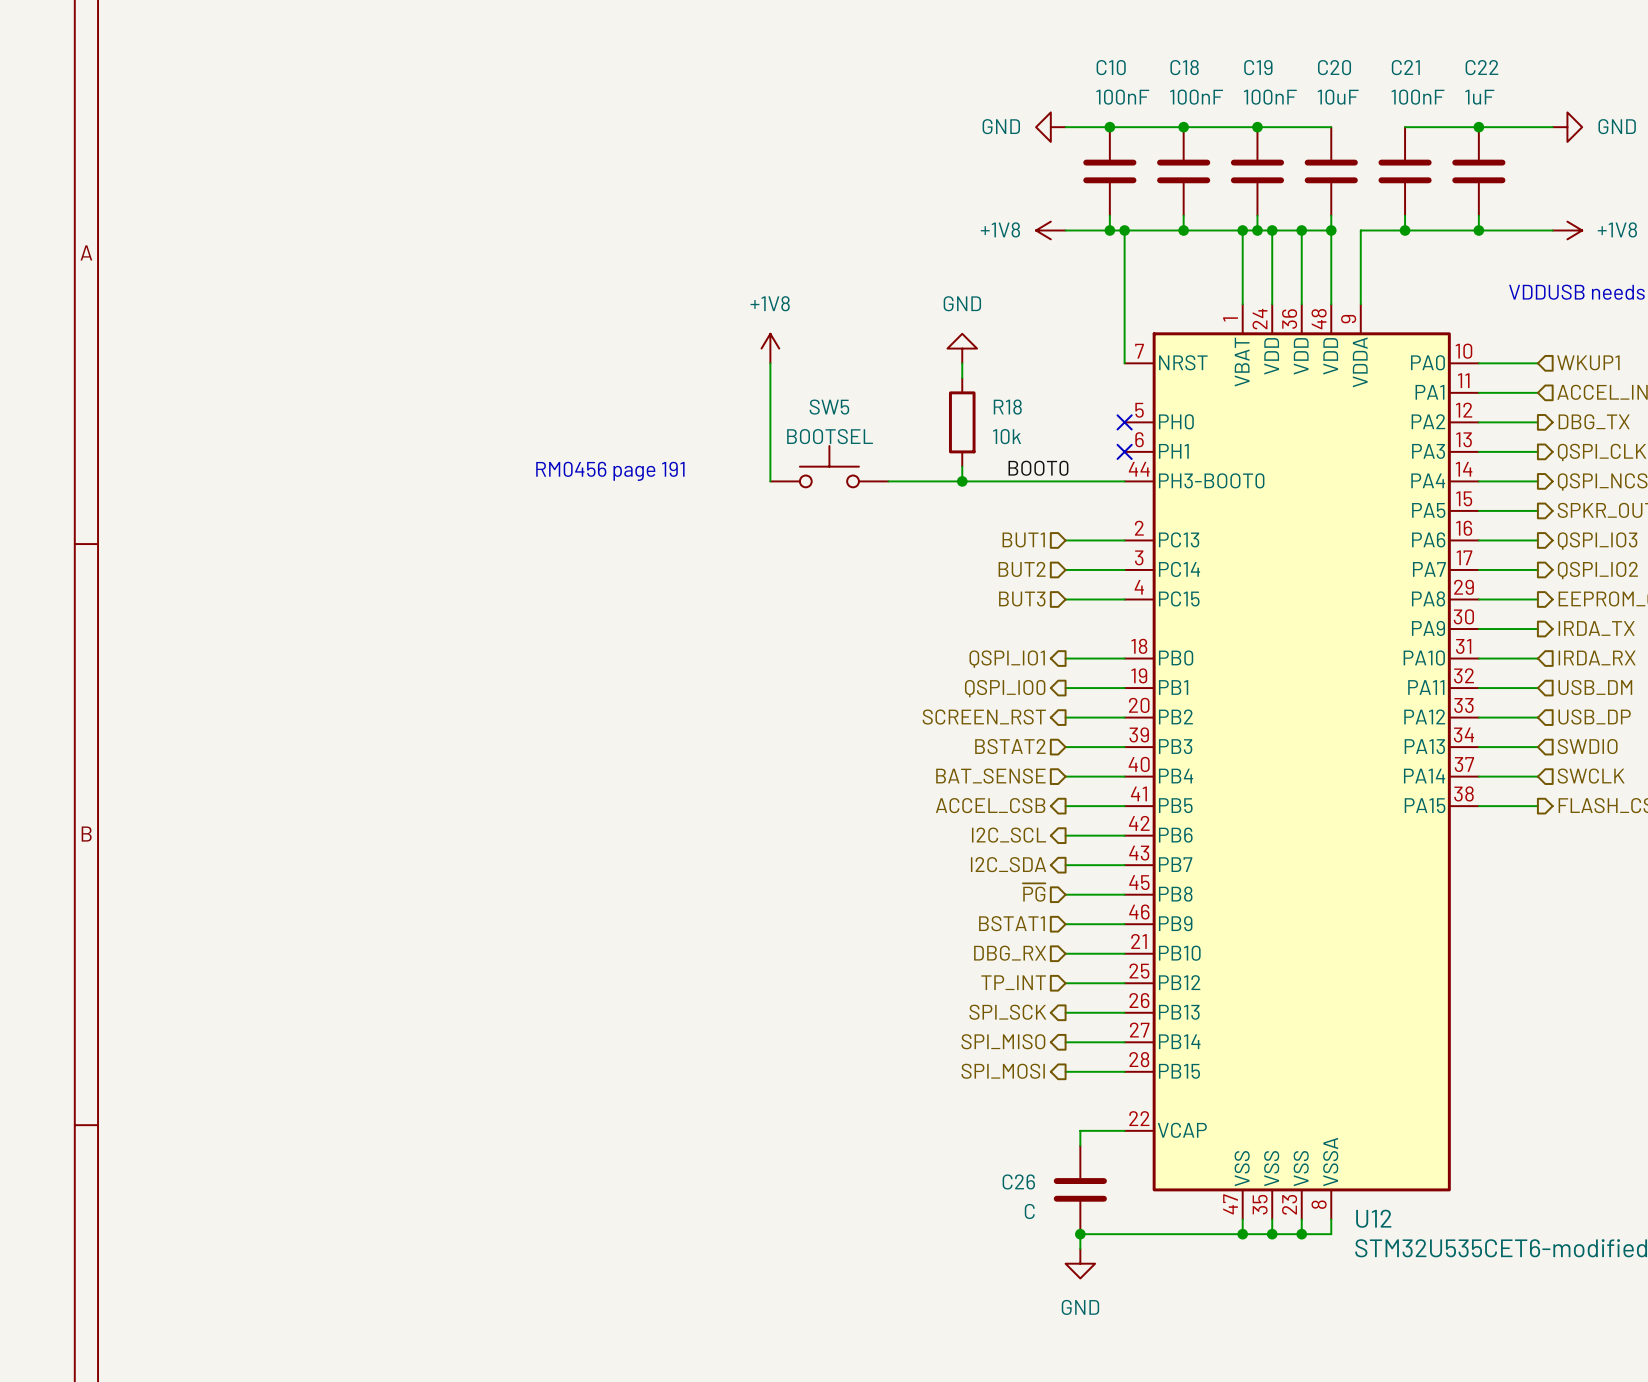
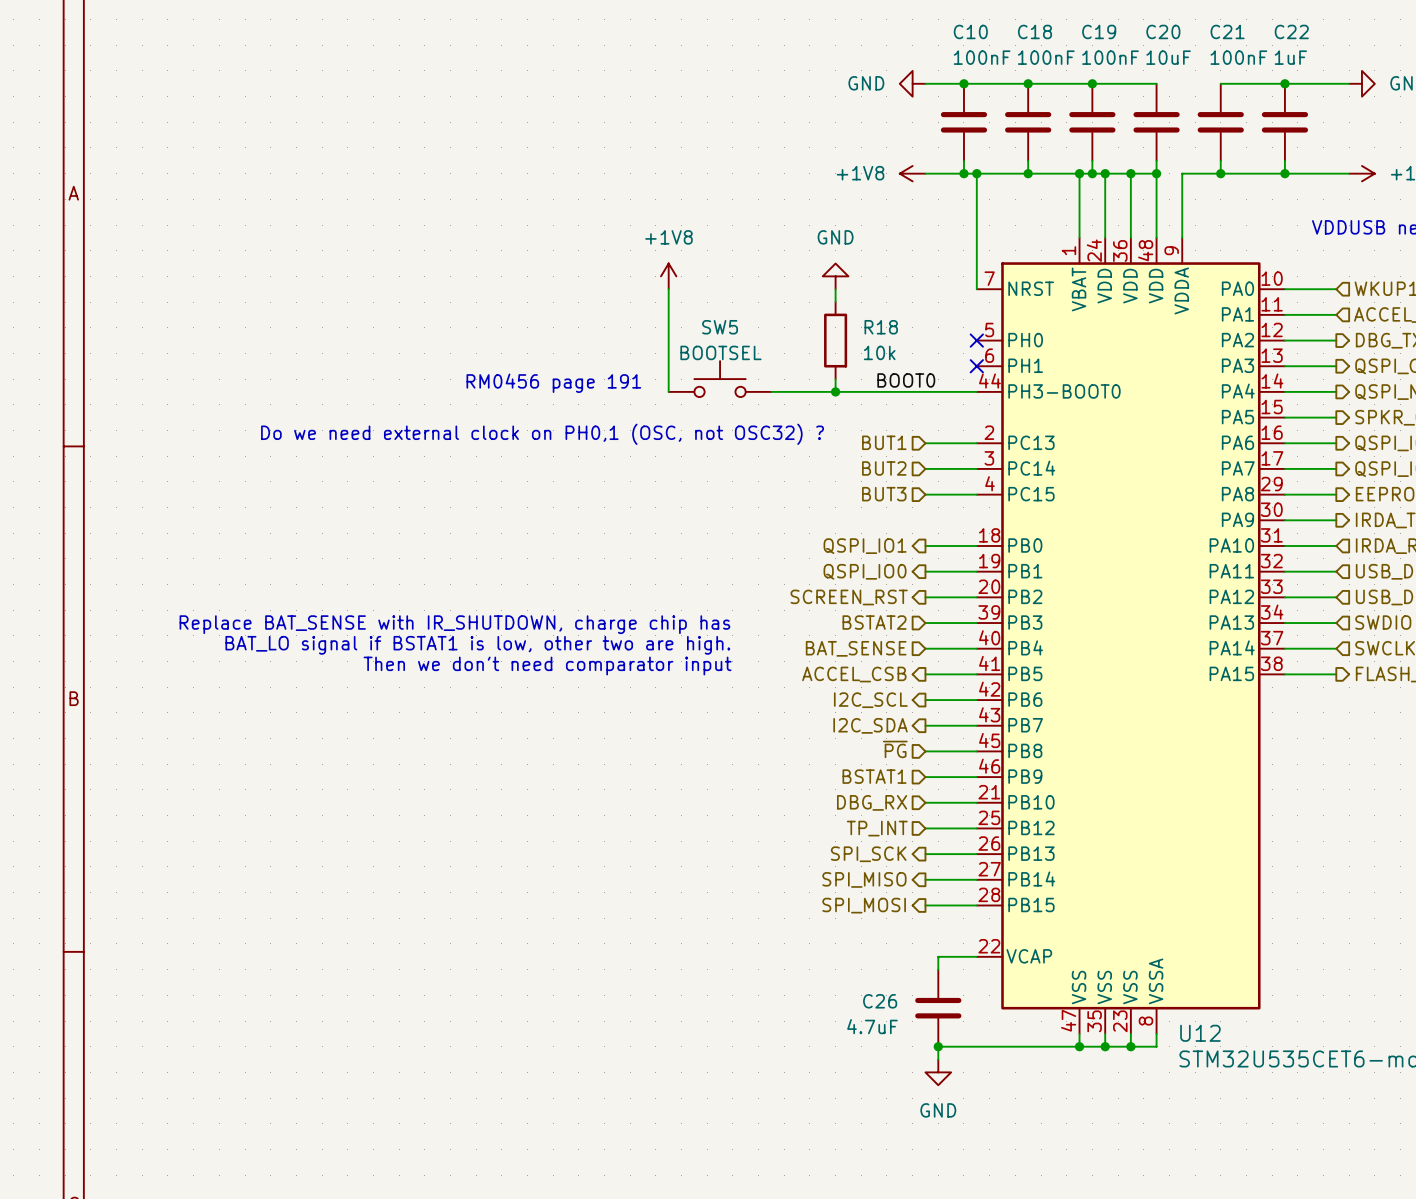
text: none -> Do we need external clock on PH0,1 (OSC, not OSC32) ? (542, 434)
text: none -> Replace BAT_SENSE with IR_SHUTDOWN, charge chip has (454, 624)
text: none -> BAT_LO signal if BSTAT1 is low, other two are high. (477, 645)
text: none -> Then we don't need comparator input (547, 666)
C26 value: C (1029, 1211) -> 4.7uF (872, 1026)

